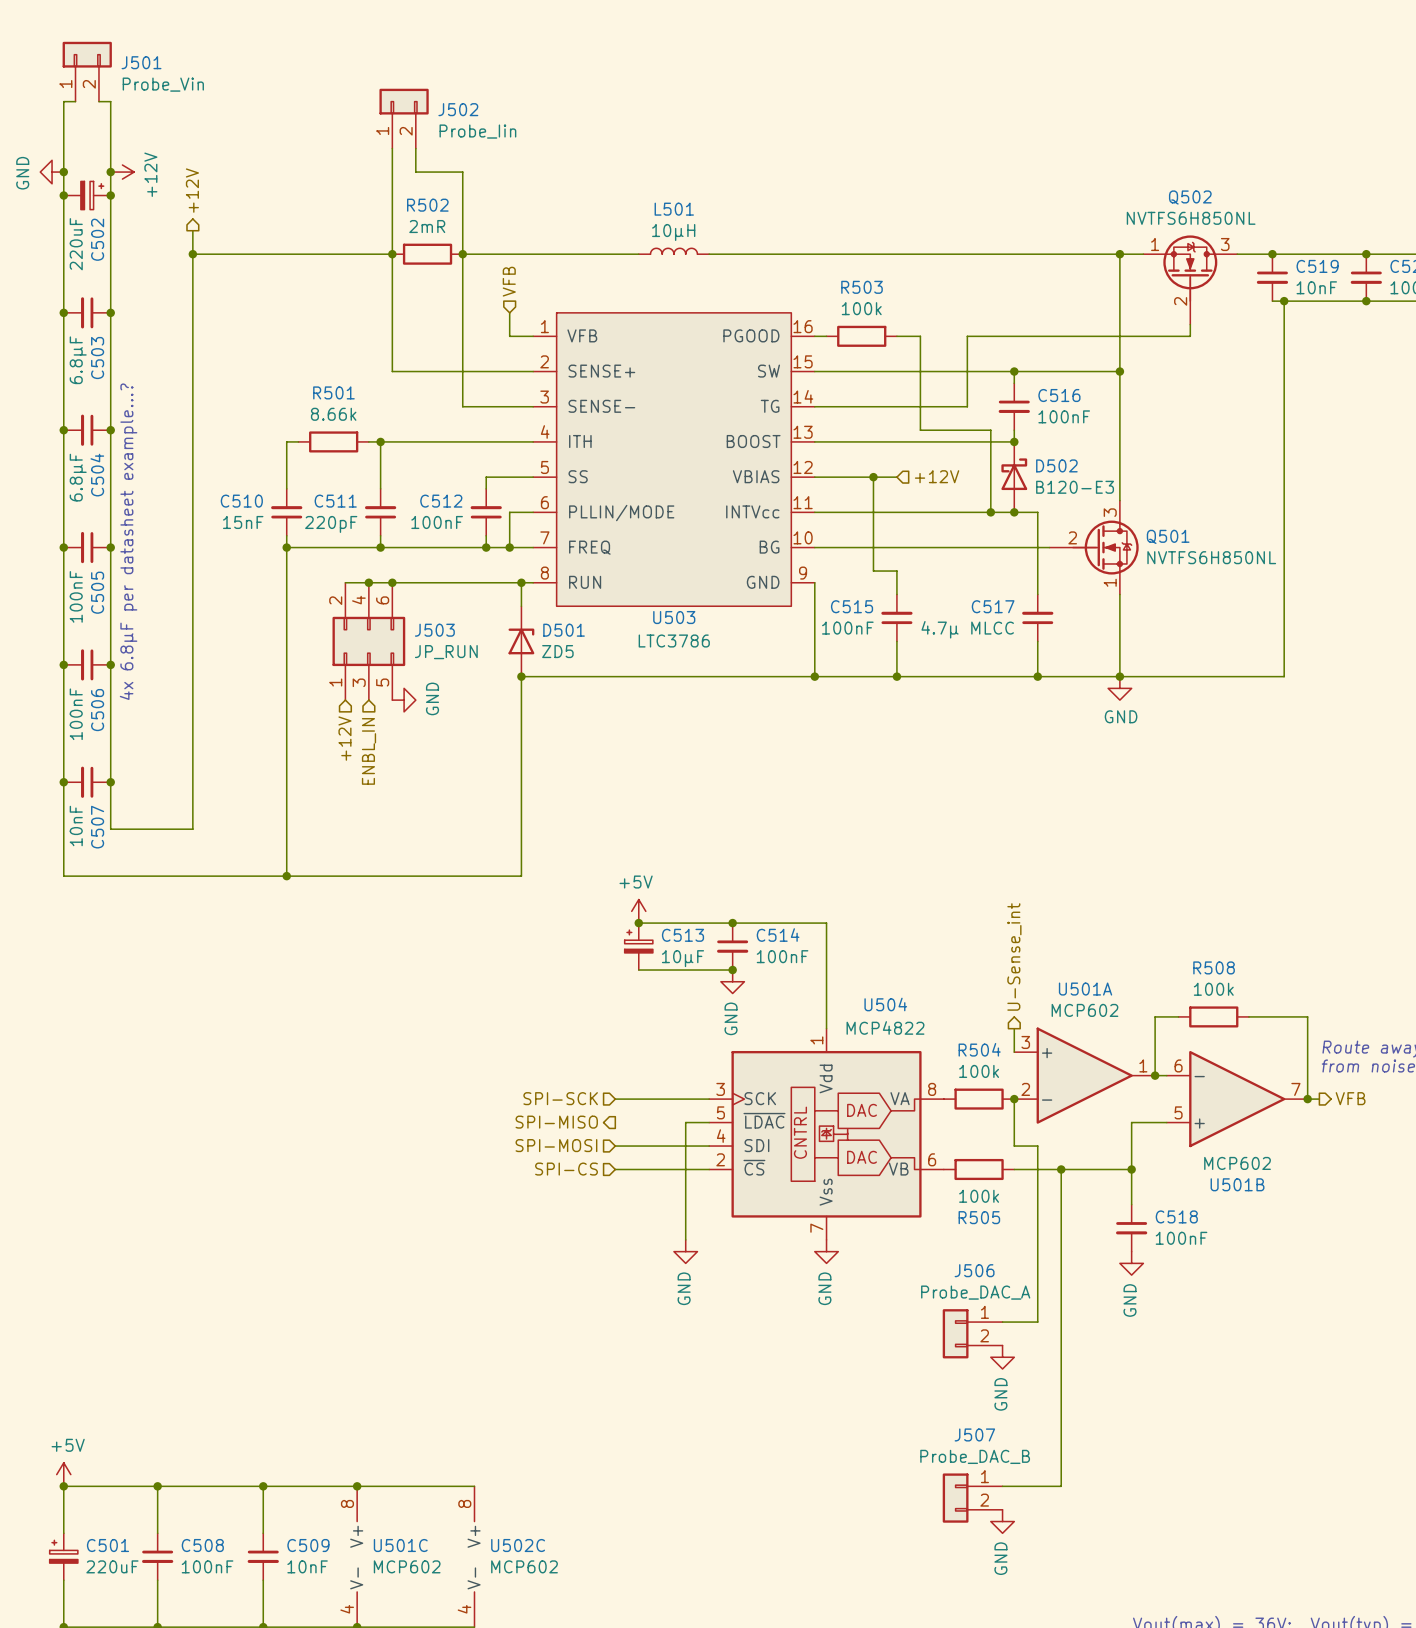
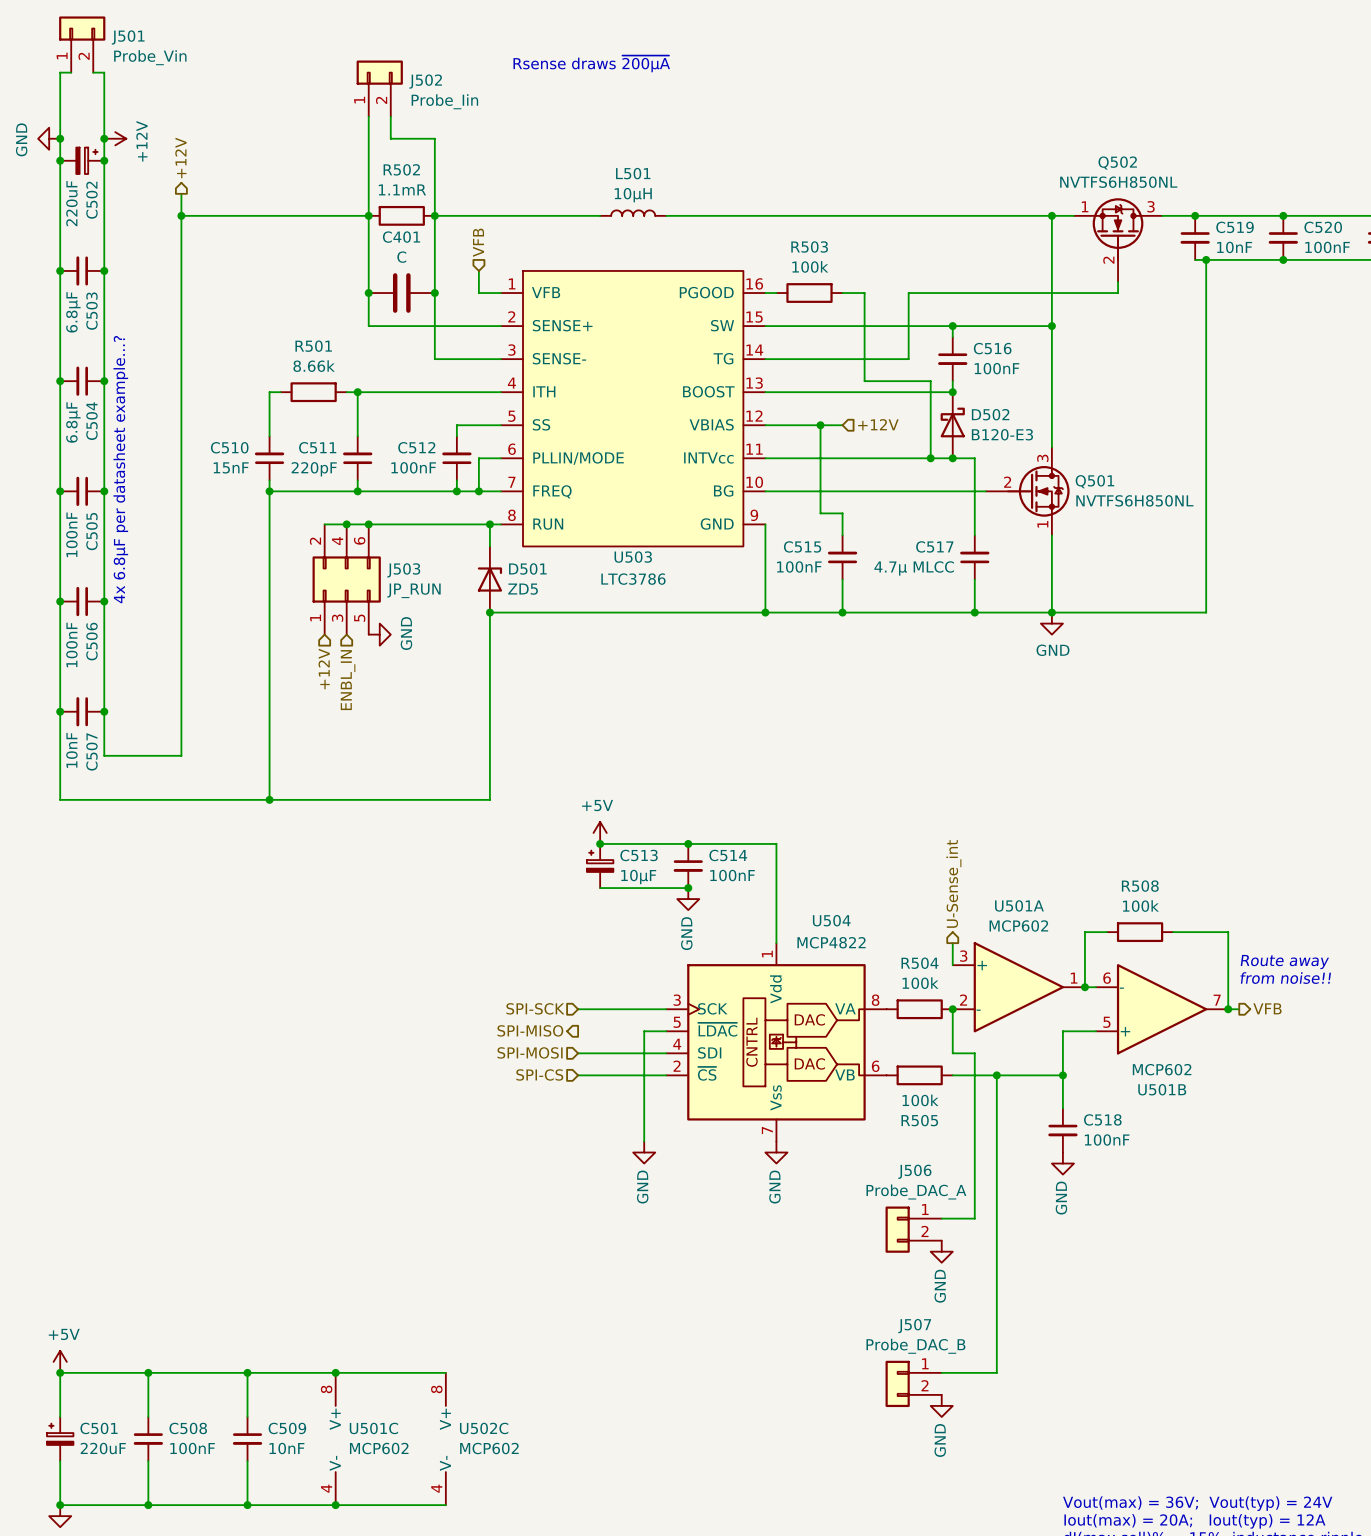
text: none -> Rsense draws ~{200µA} (591, 63)
R502 value: 2mR (427, 226) -> 1.1mR (402, 189)
junction: none -> (368, 293)
C401: none -> C (401, 293)
junction: none -> (434, 293)

